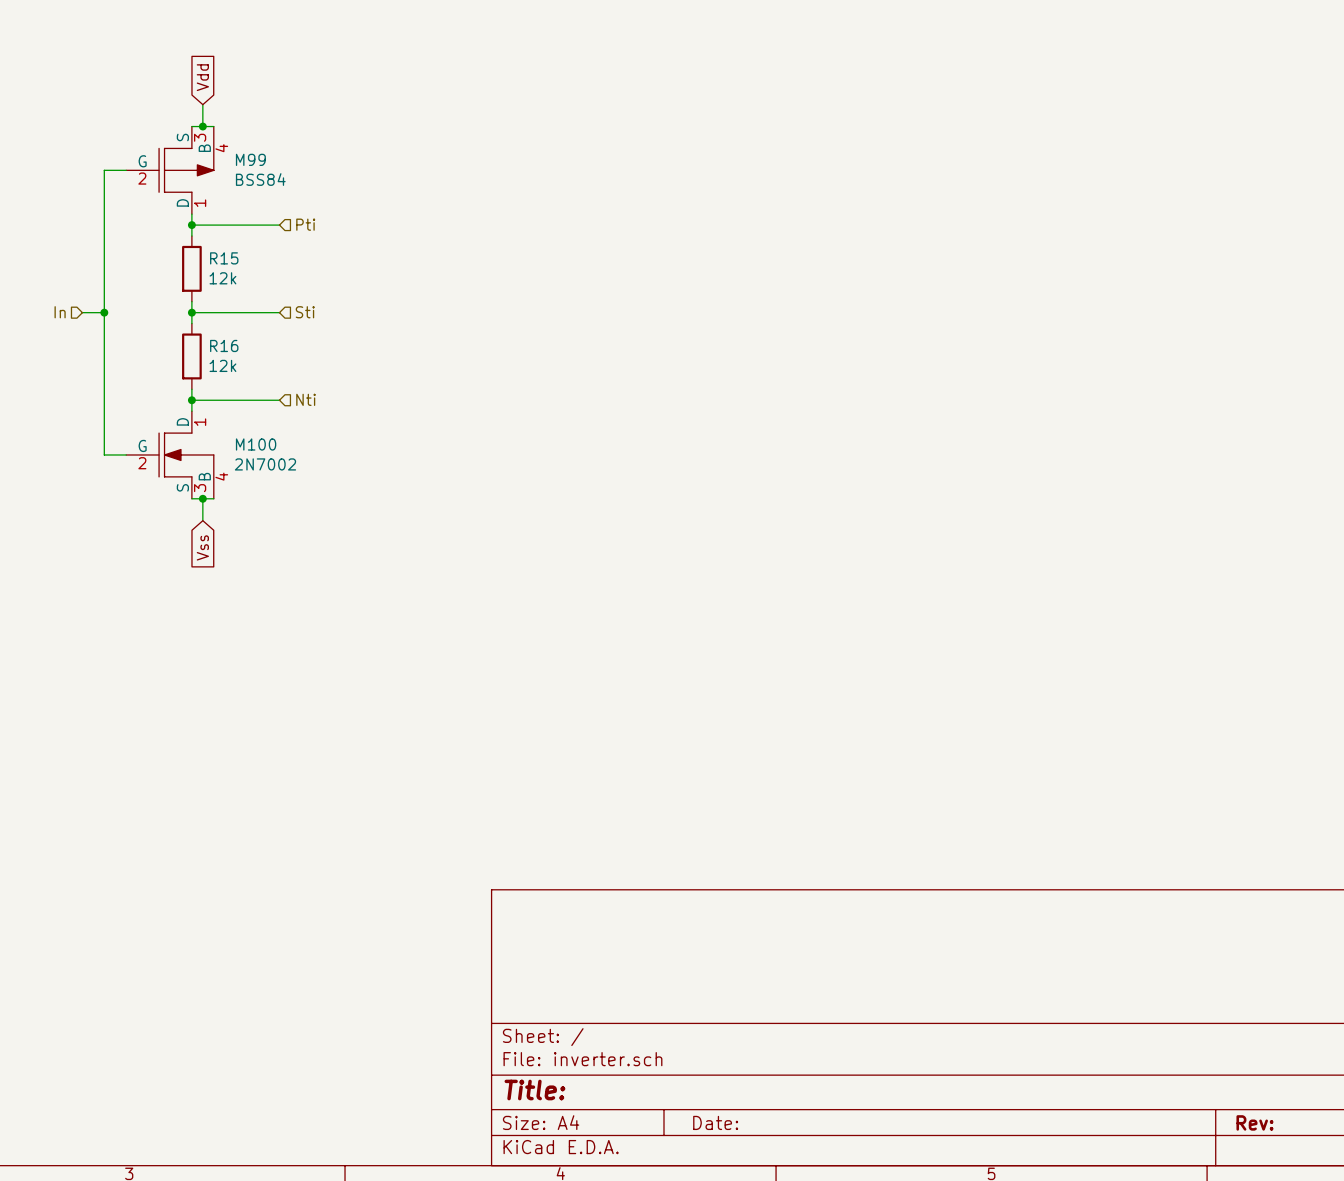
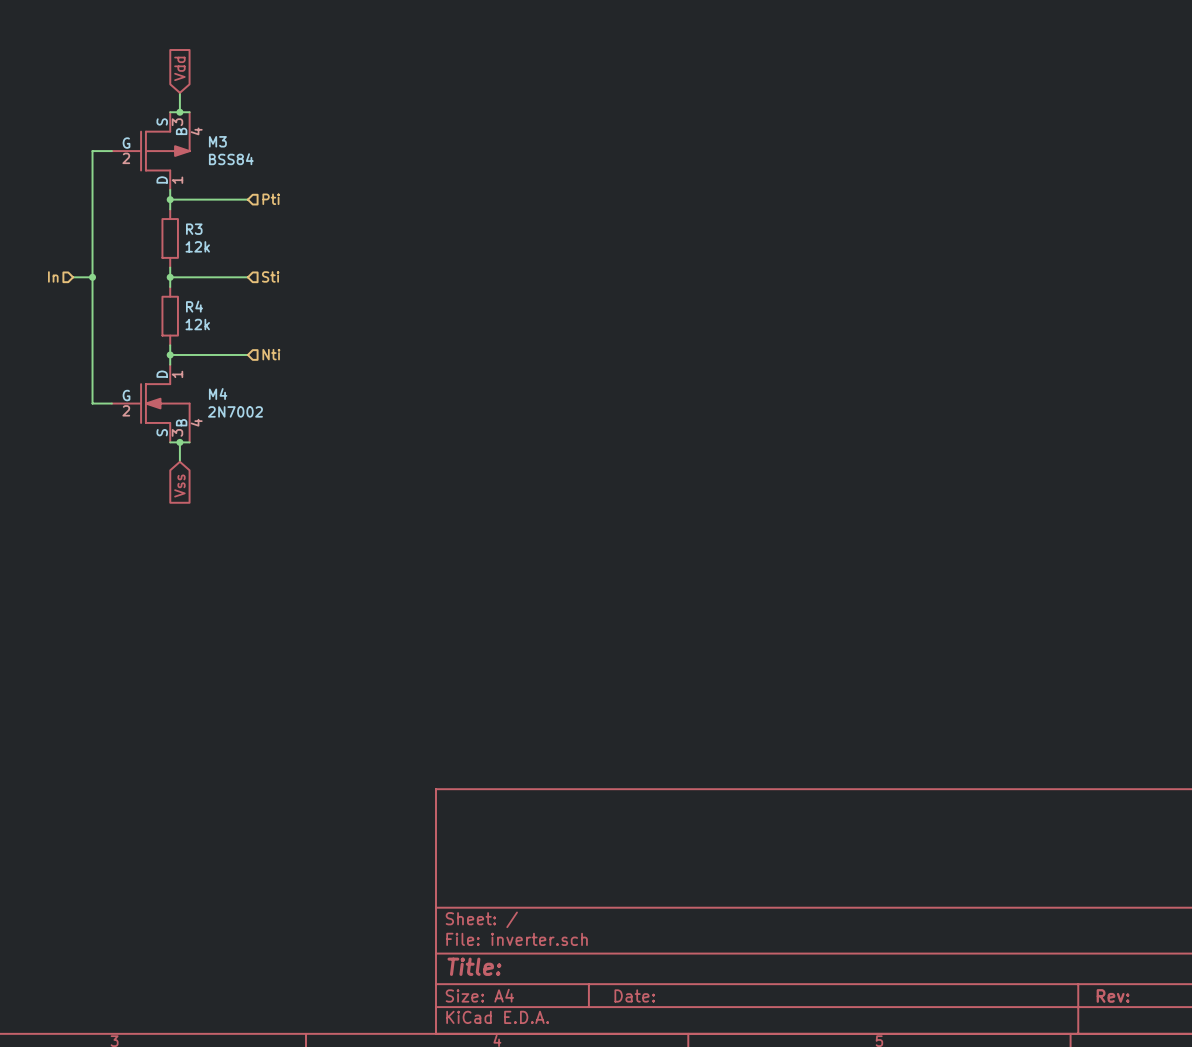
M99 name: M99 (250, 159) -> M3 (217, 141)
R15 name: R15 (224, 258) -> R3 (194, 229)
R16 name: R16 (224, 345) -> R4 (194, 306)
M100 name: M100 (256, 444) -> M4 (218, 394)

